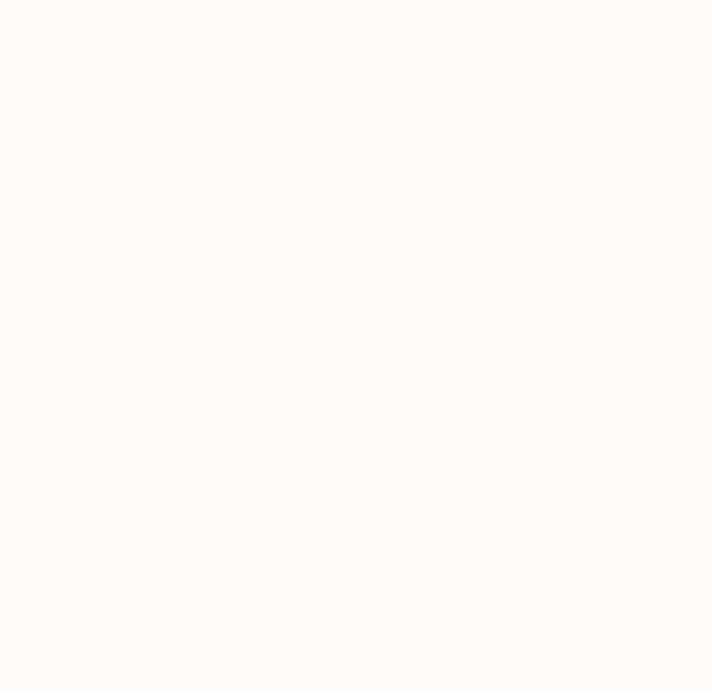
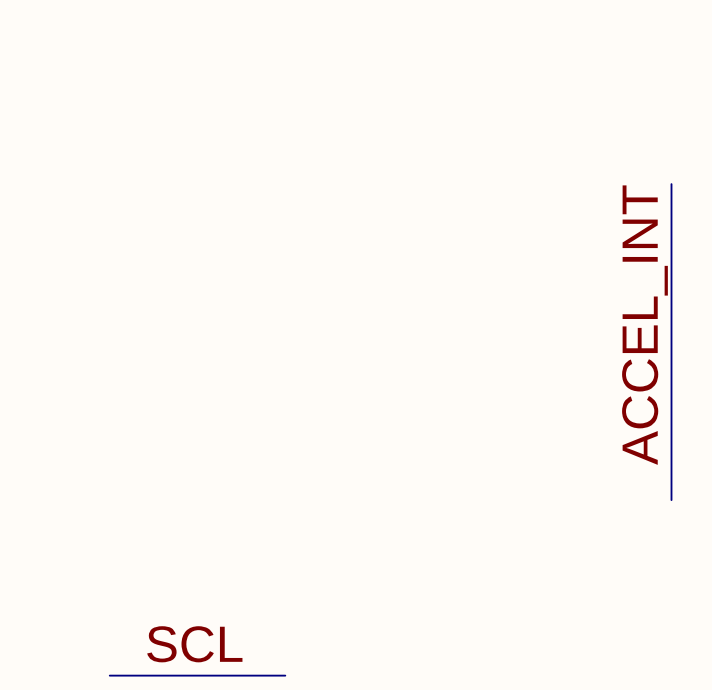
wire: none -> (671, 184) (671, 500)
label: none -> ACCEL_INT (644, 325)
label: none -> SCL (194, 644)
wire: none -> (109, 675) (285, 675)

